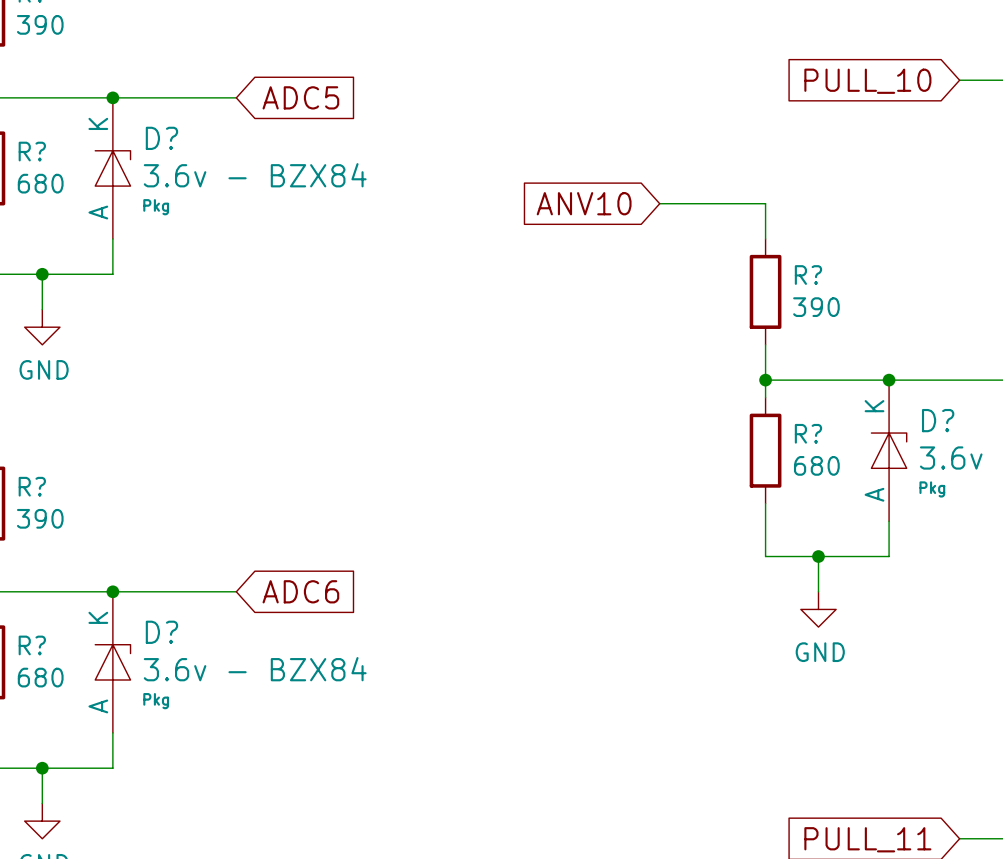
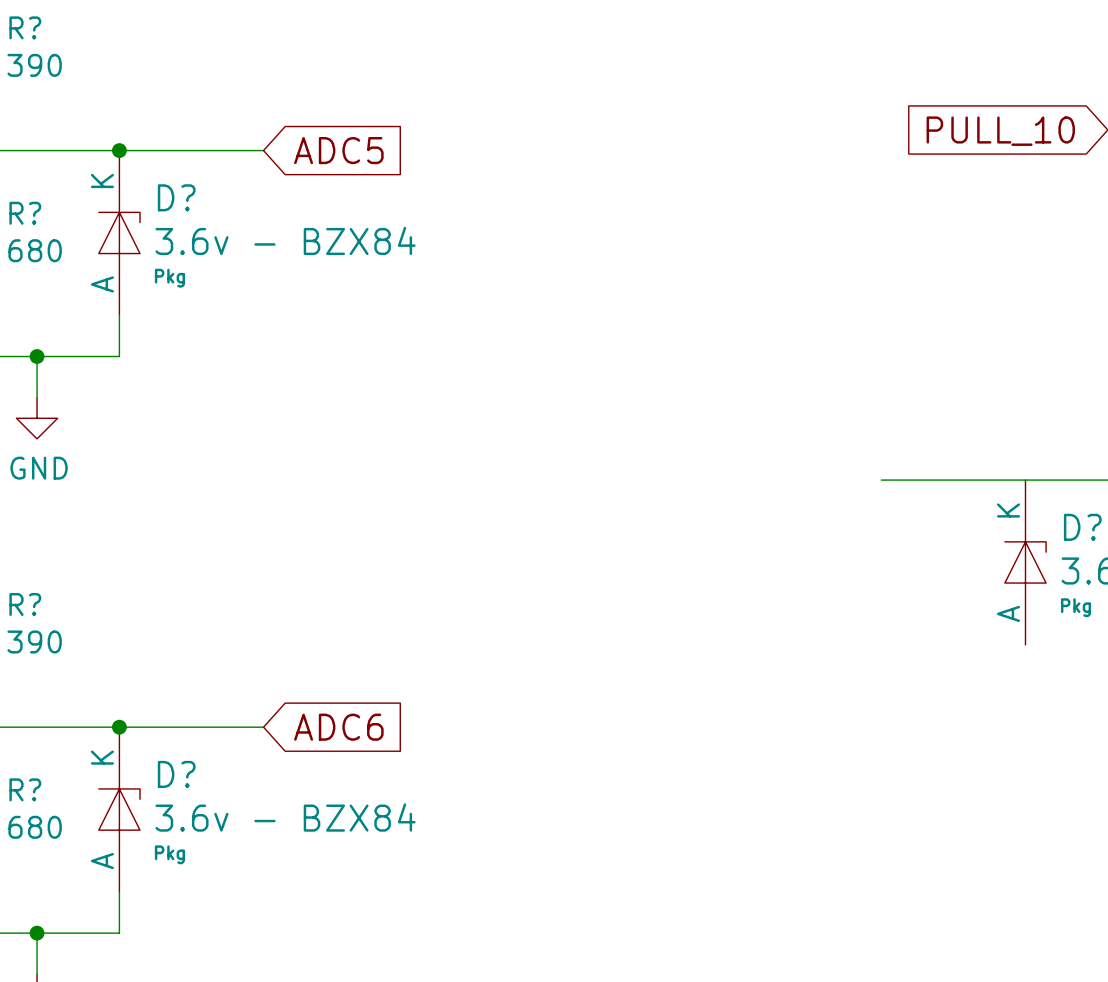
global label: ANV10 (584, 203) -> none
wire: (659, 203) (765, 203) (765, 238) -> none
R?: 390 (765, 291) -> none
wire: (765, 344) (765, 397) -> none
junction: (765, 380) -> none
junction: (889, 380) -> none
R?: 680 (765, 450) -> none
wire: (765, 503) (765, 556) (889, 556) (889, 521) -> none
wire: (818, 556) (818, 591) -> none
junction: (818, 556) -> none
power symbol: GND (818, 609) -> none

